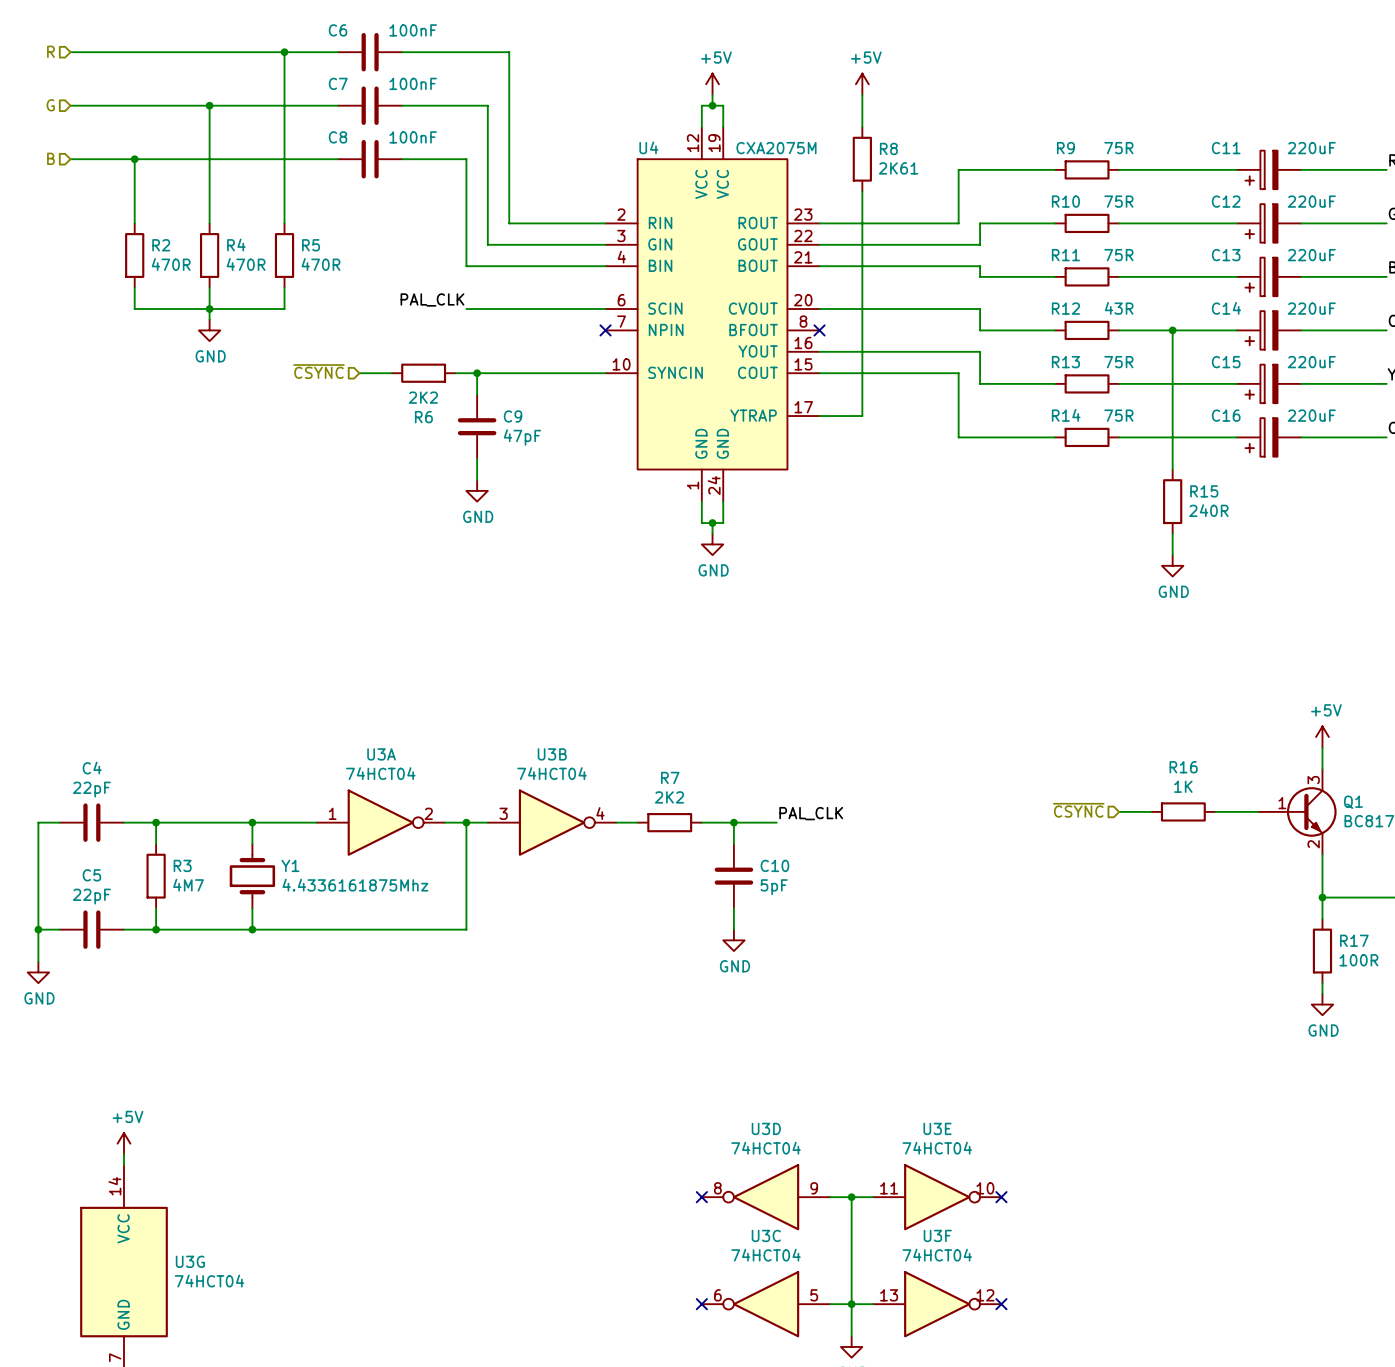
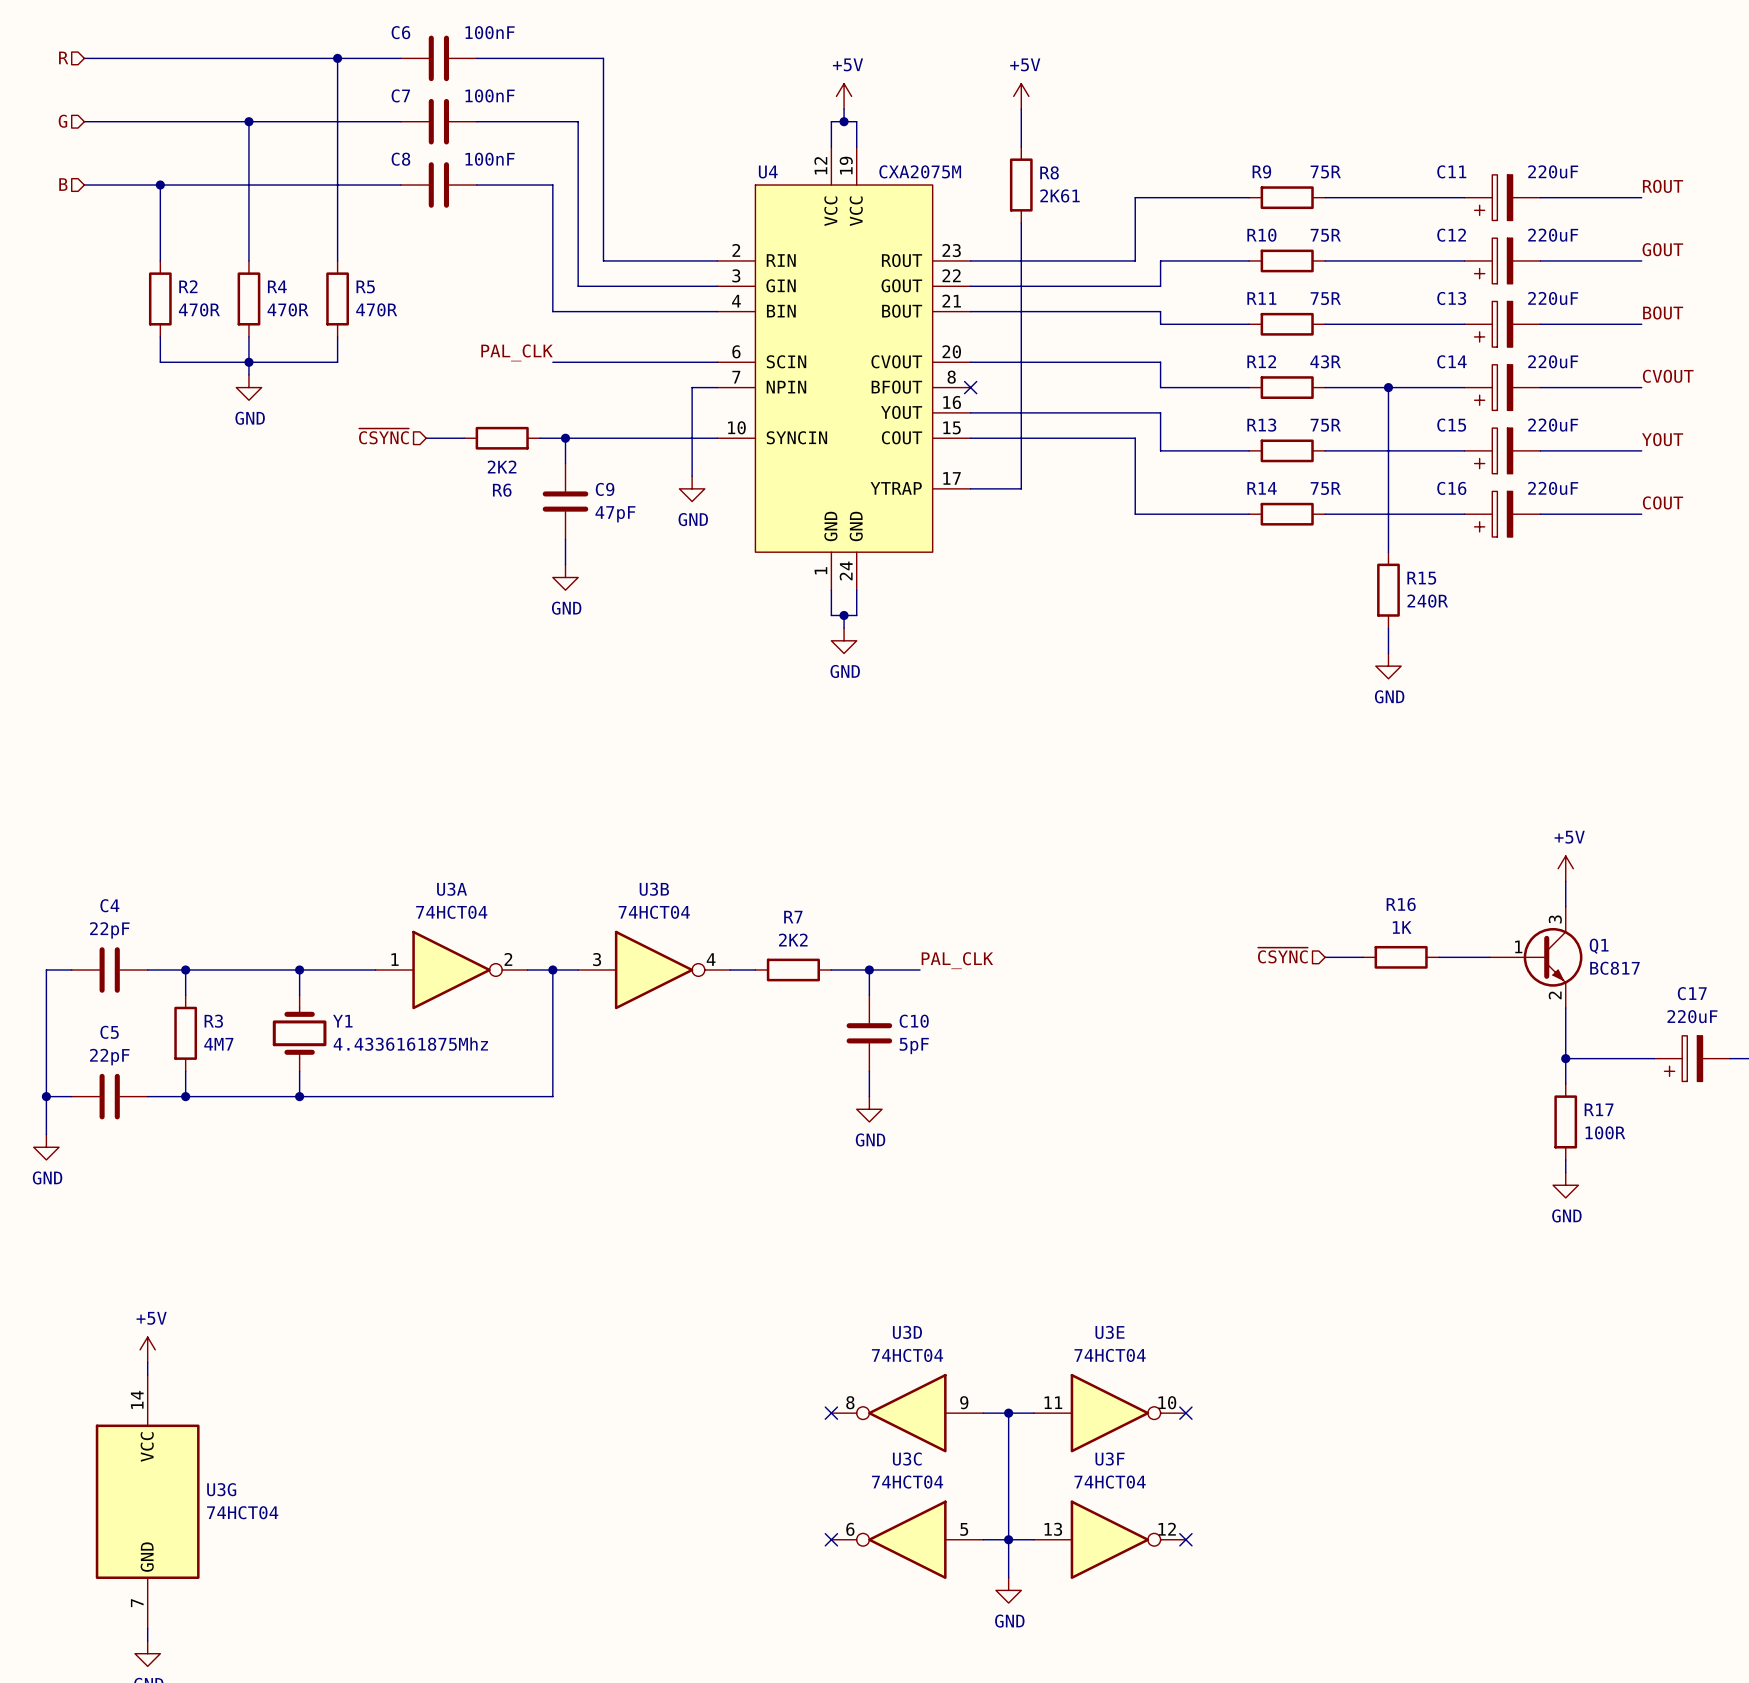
wire: none -> (717, 387) (692, 387) (692, 476)
no-connect mark: (605, 330) -> none
power symbol: none -> GND (692, 488)

